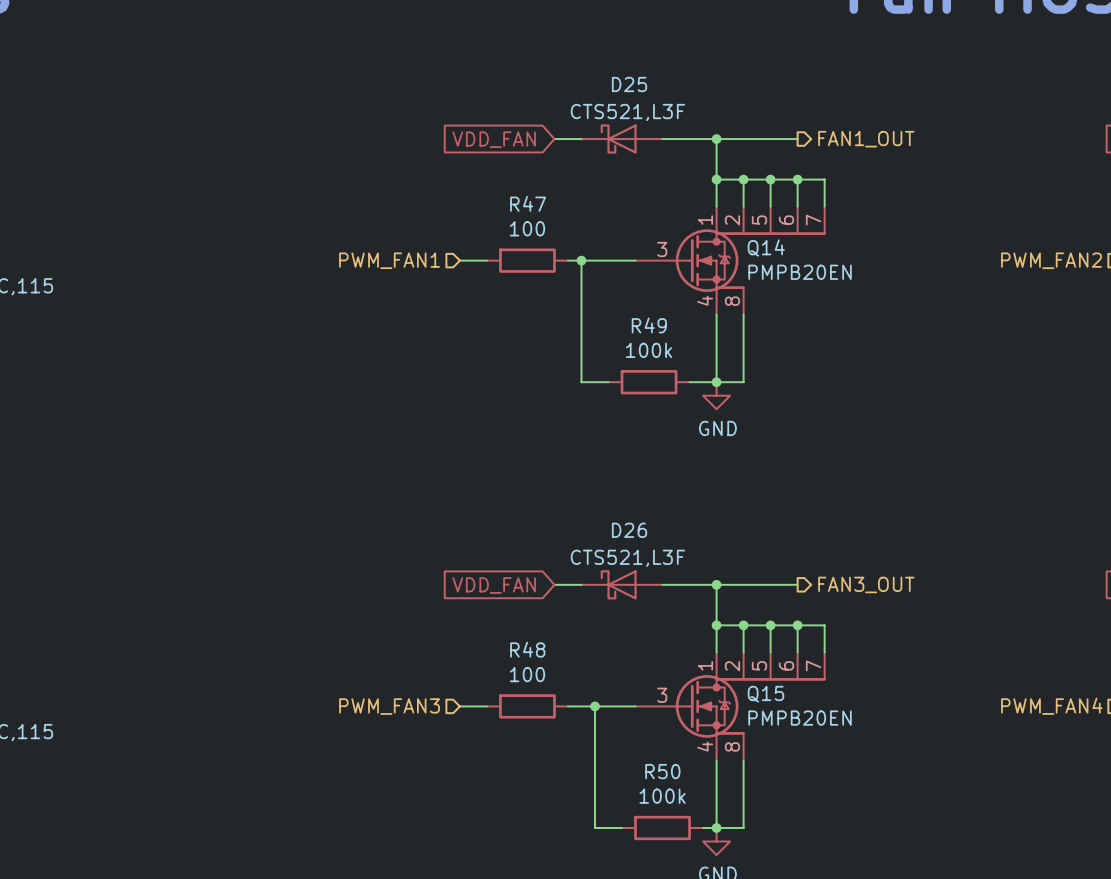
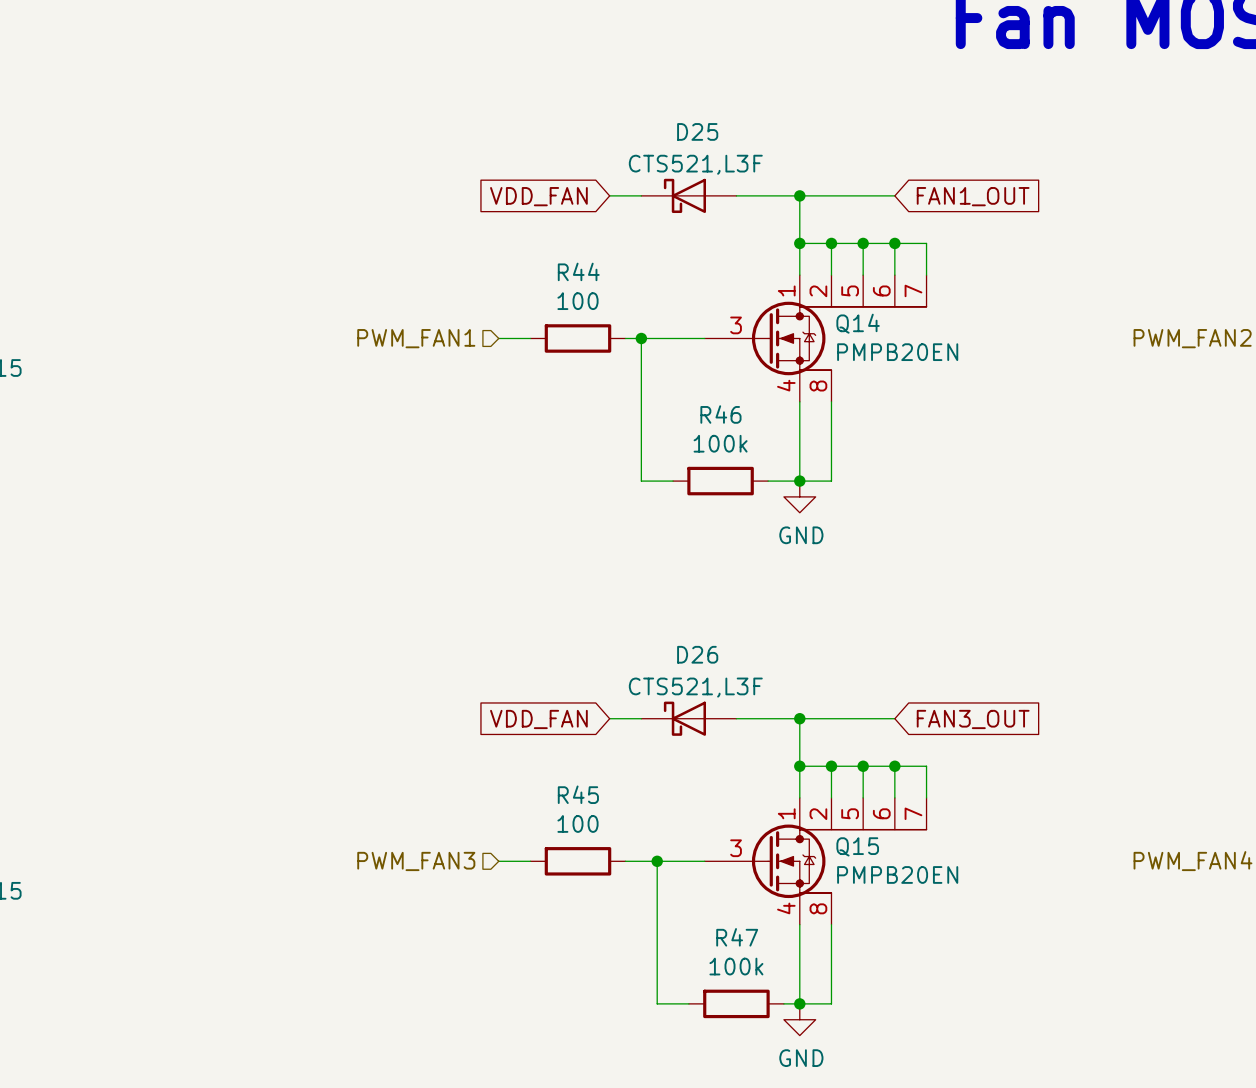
global label: none -> FAN1_OUT (973, 196)
hierarchical label: FAN1_OUT (866, 139) -> none
R47 name: R47 (528, 203) -> R44 (578, 271)
R49 name: R49 (649, 325) -> R46 (720, 414)
hierarchical label: FAN3_OUT (866, 584) -> none
global label: none -> FAN3_OUT (973, 719)
R48 name: R48 (527, 649) -> R45 (578, 794)
R50 name: R50 (662, 771) -> R47 (737, 937)

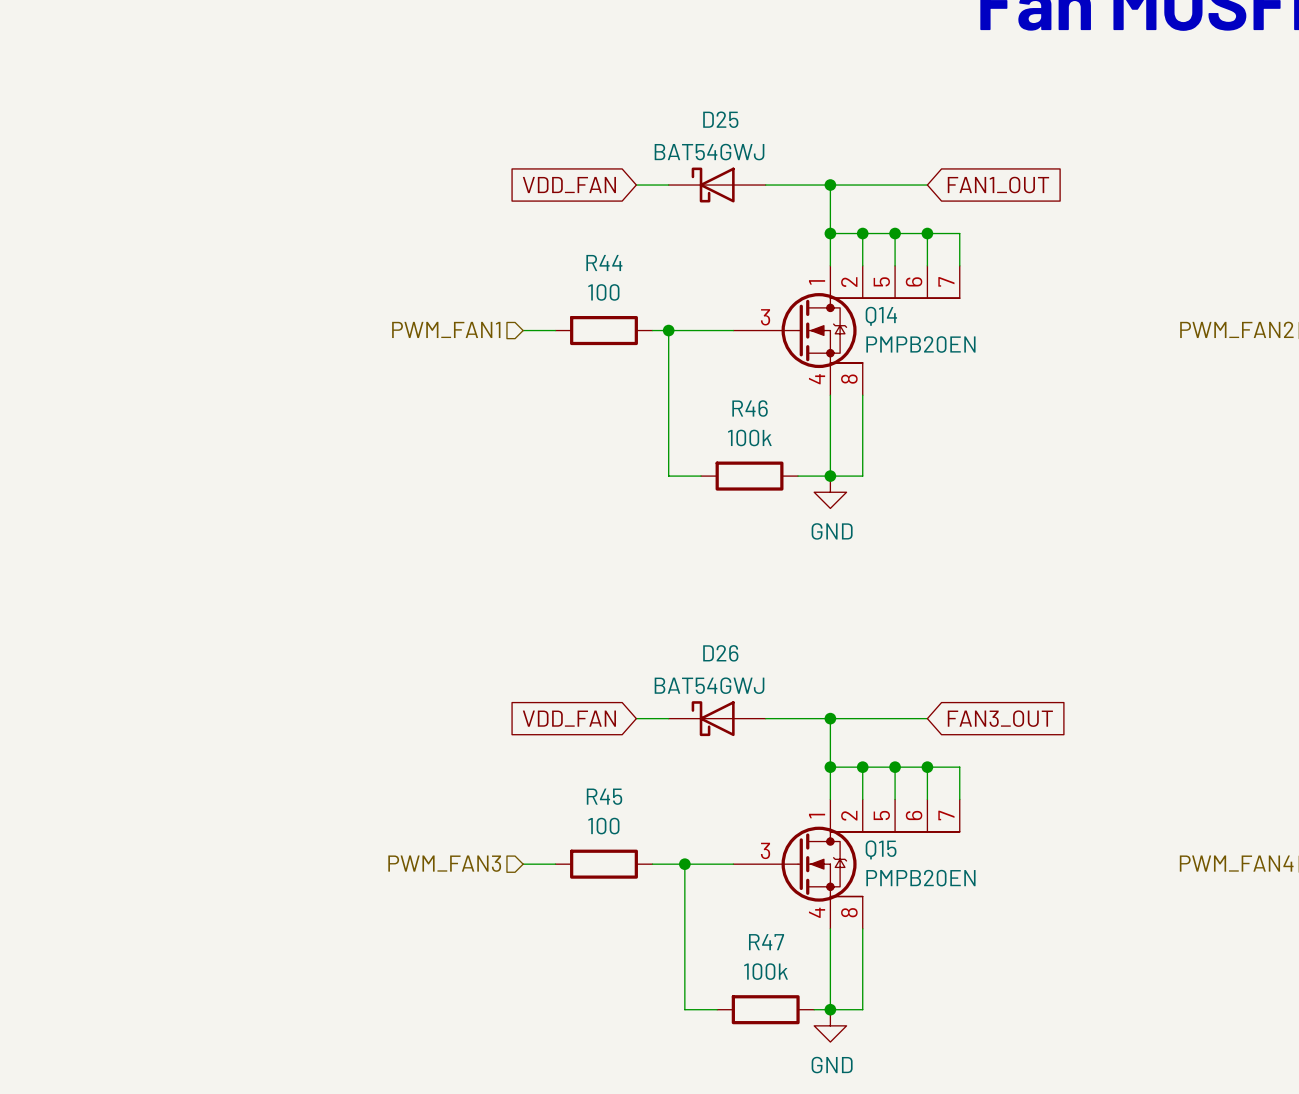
D25 value: CTS521,L3F (695, 164) -> BAT54GWJ (709, 152)
D26 value: CTS521,L3F (695, 687) -> BAT54GWJ (709, 685)

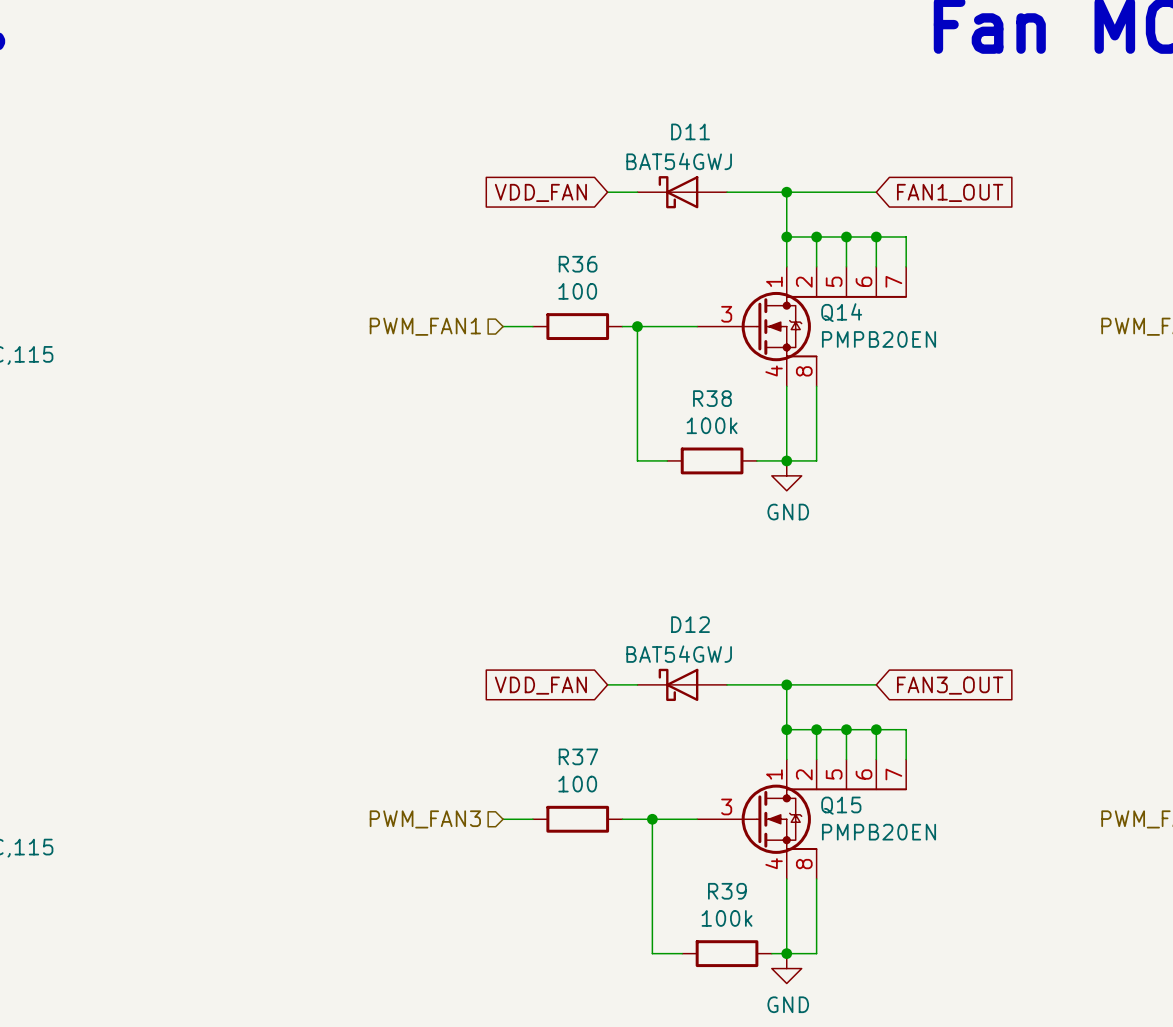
D25 name: D25 (720, 119) -> D11 (690, 131)
R44 name: R44 (604, 263) -> R36 (578, 264)
R46 name: R46 (750, 408) -> R38 (712, 398)
D26 name: D26 (720, 653) -> D12 (690, 624)
R45 name: R45 (604, 796) -> R37 (578, 756)
R47 name: R47 (766, 942) -> R39 (727, 891)

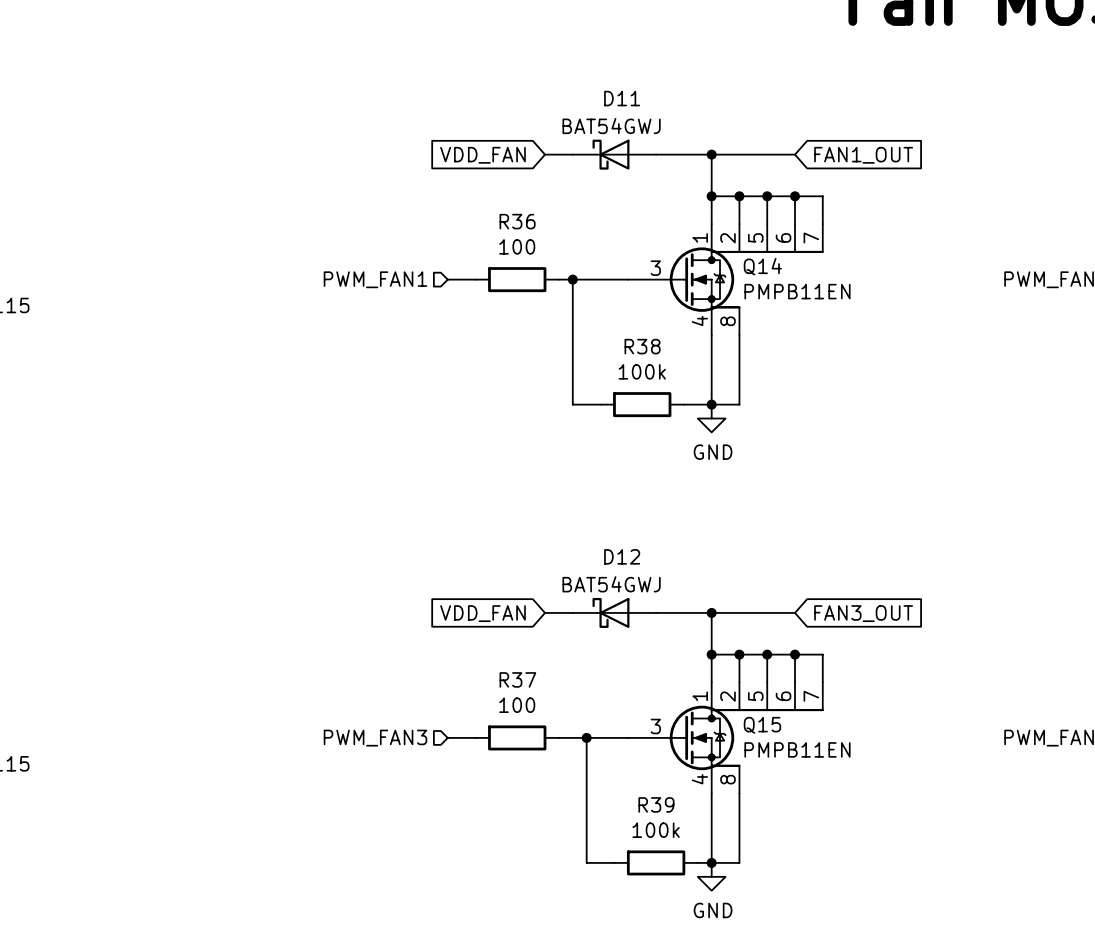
Q14 value: PMPB20EN (879, 339) -> PMPB11EN (797, 291)
Q15 value: PMPB20EN (879, 832) -> PMPB11EN (797, 749)

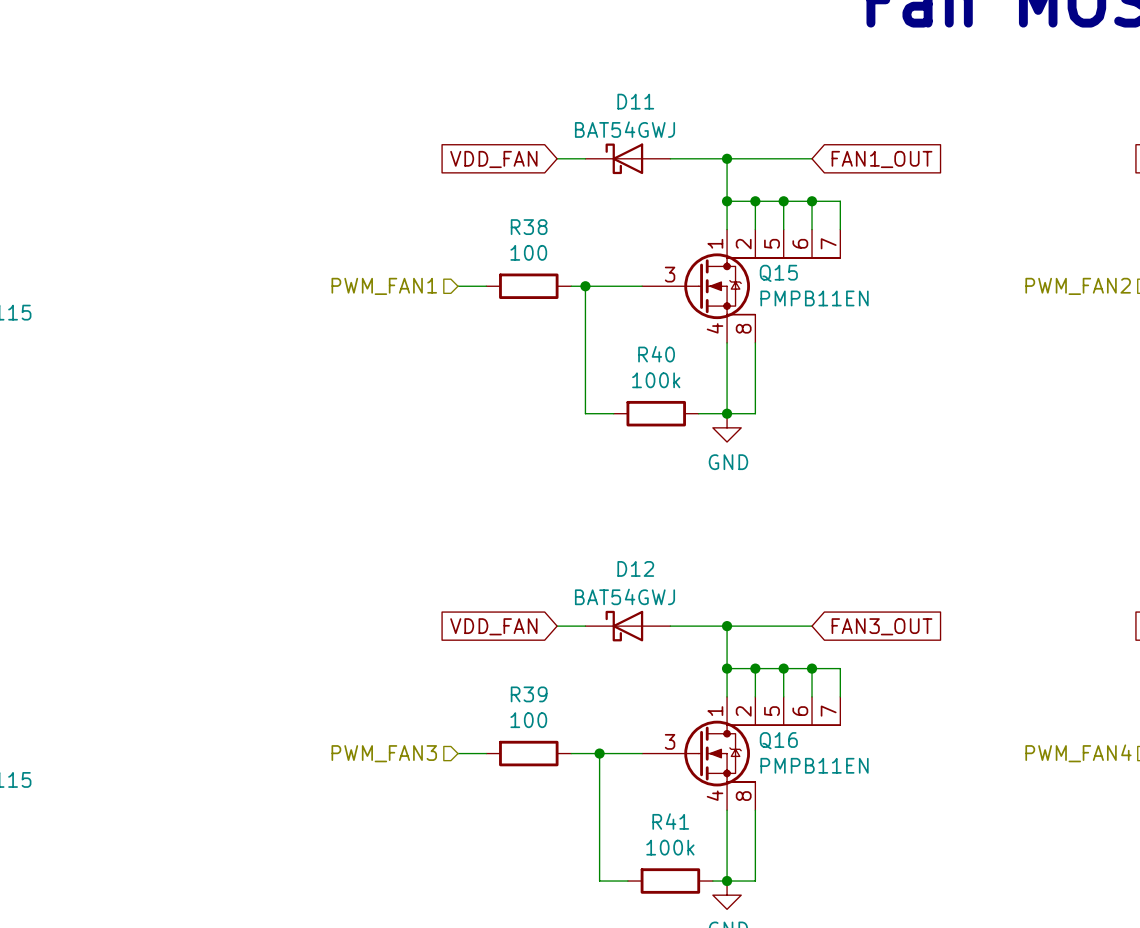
R36 name: R36 (517, 221) -> R38 (529, 227)
Q14 name: Q14 (762, 266) -> Q15 (778, 273)
R38 name: R38 (642, 346) -> R40 (656, 354)
R37 name: R37 (517, 679) -> R39 (529, 694)
Q15 name: Q15 (762, 725) -> Q16 (778, 740)
R39 name: R39 (656, 804) -> R41 (670, 821)

